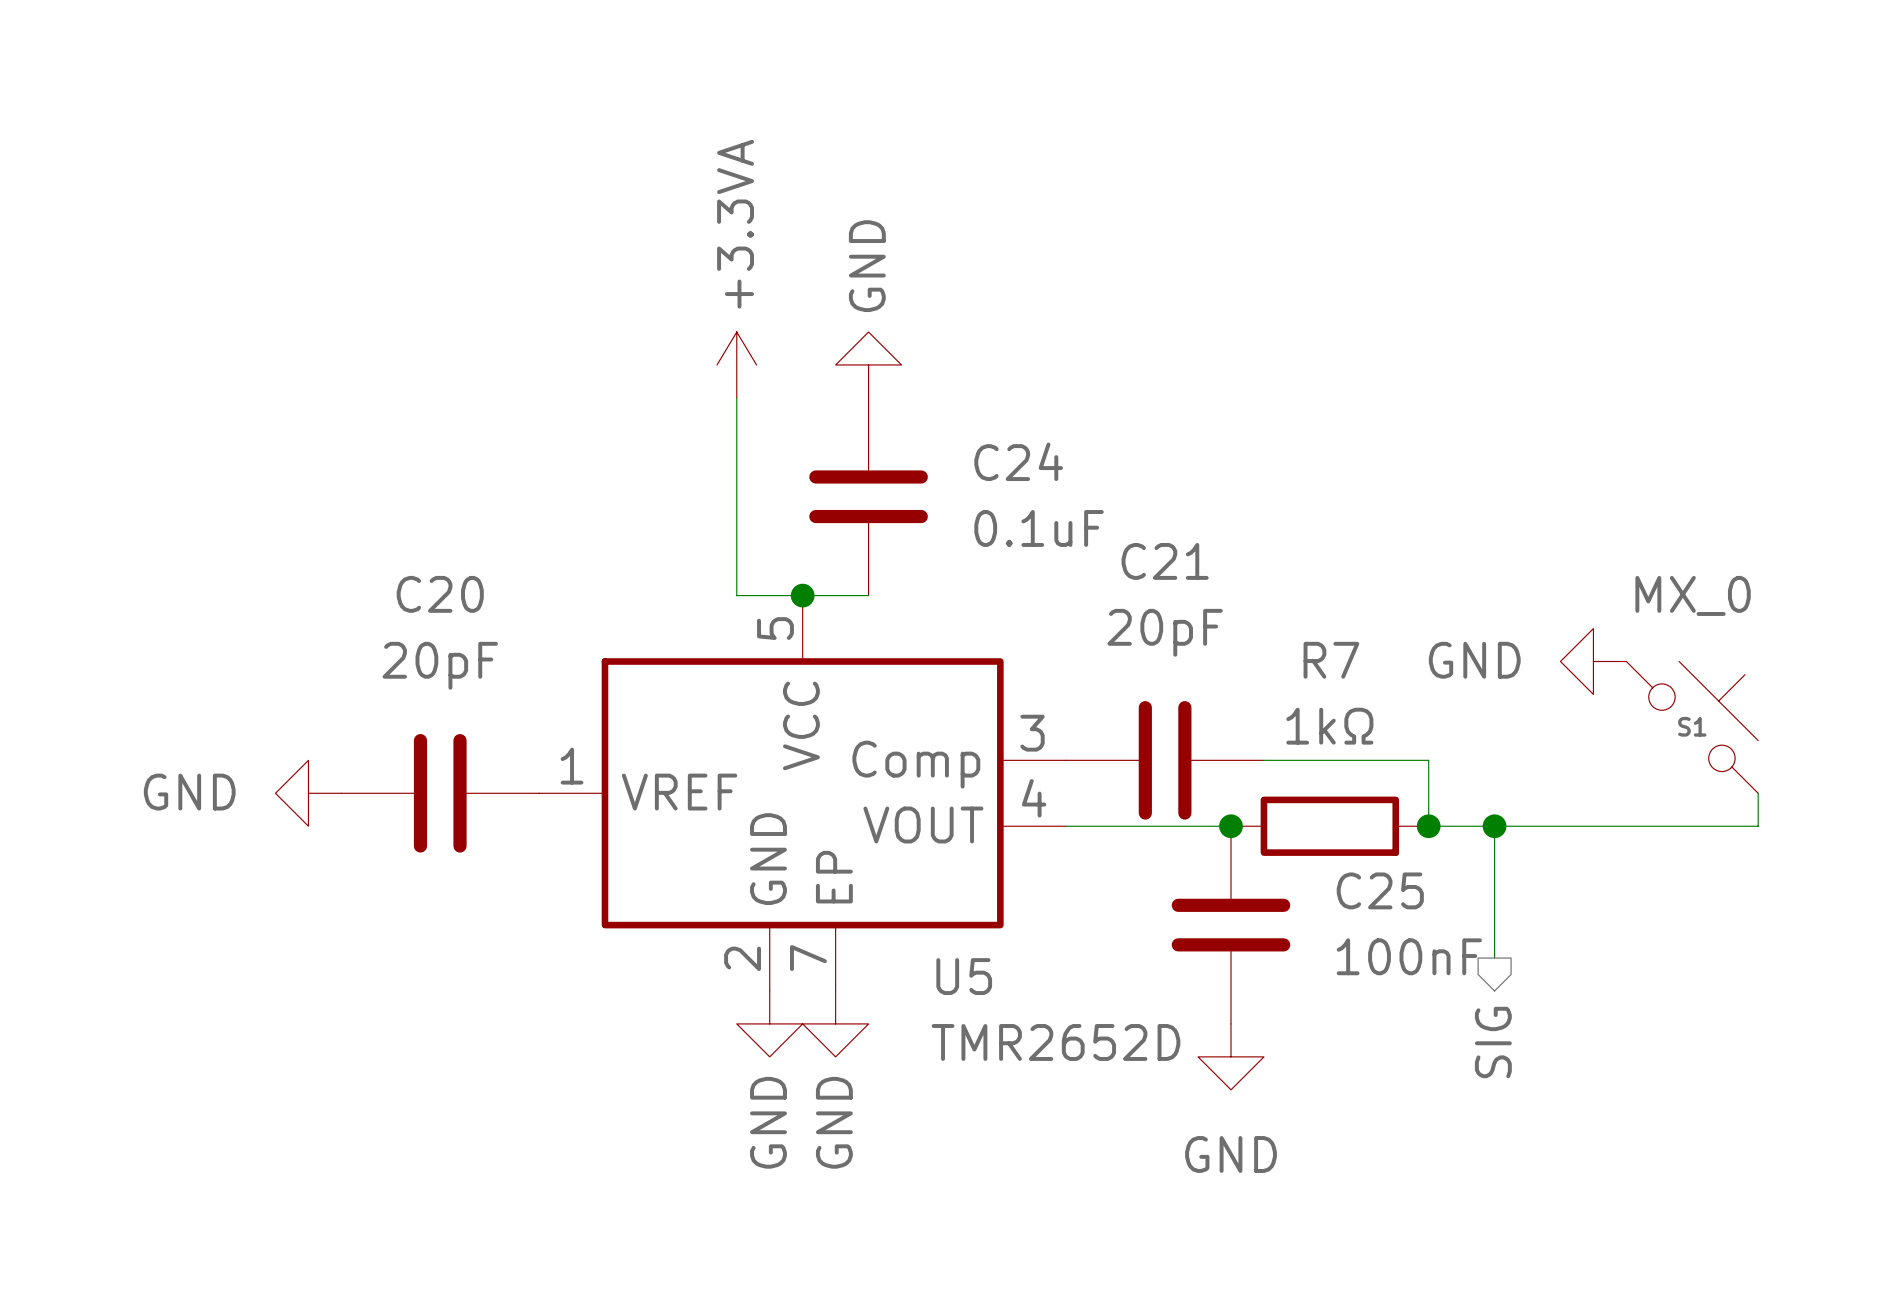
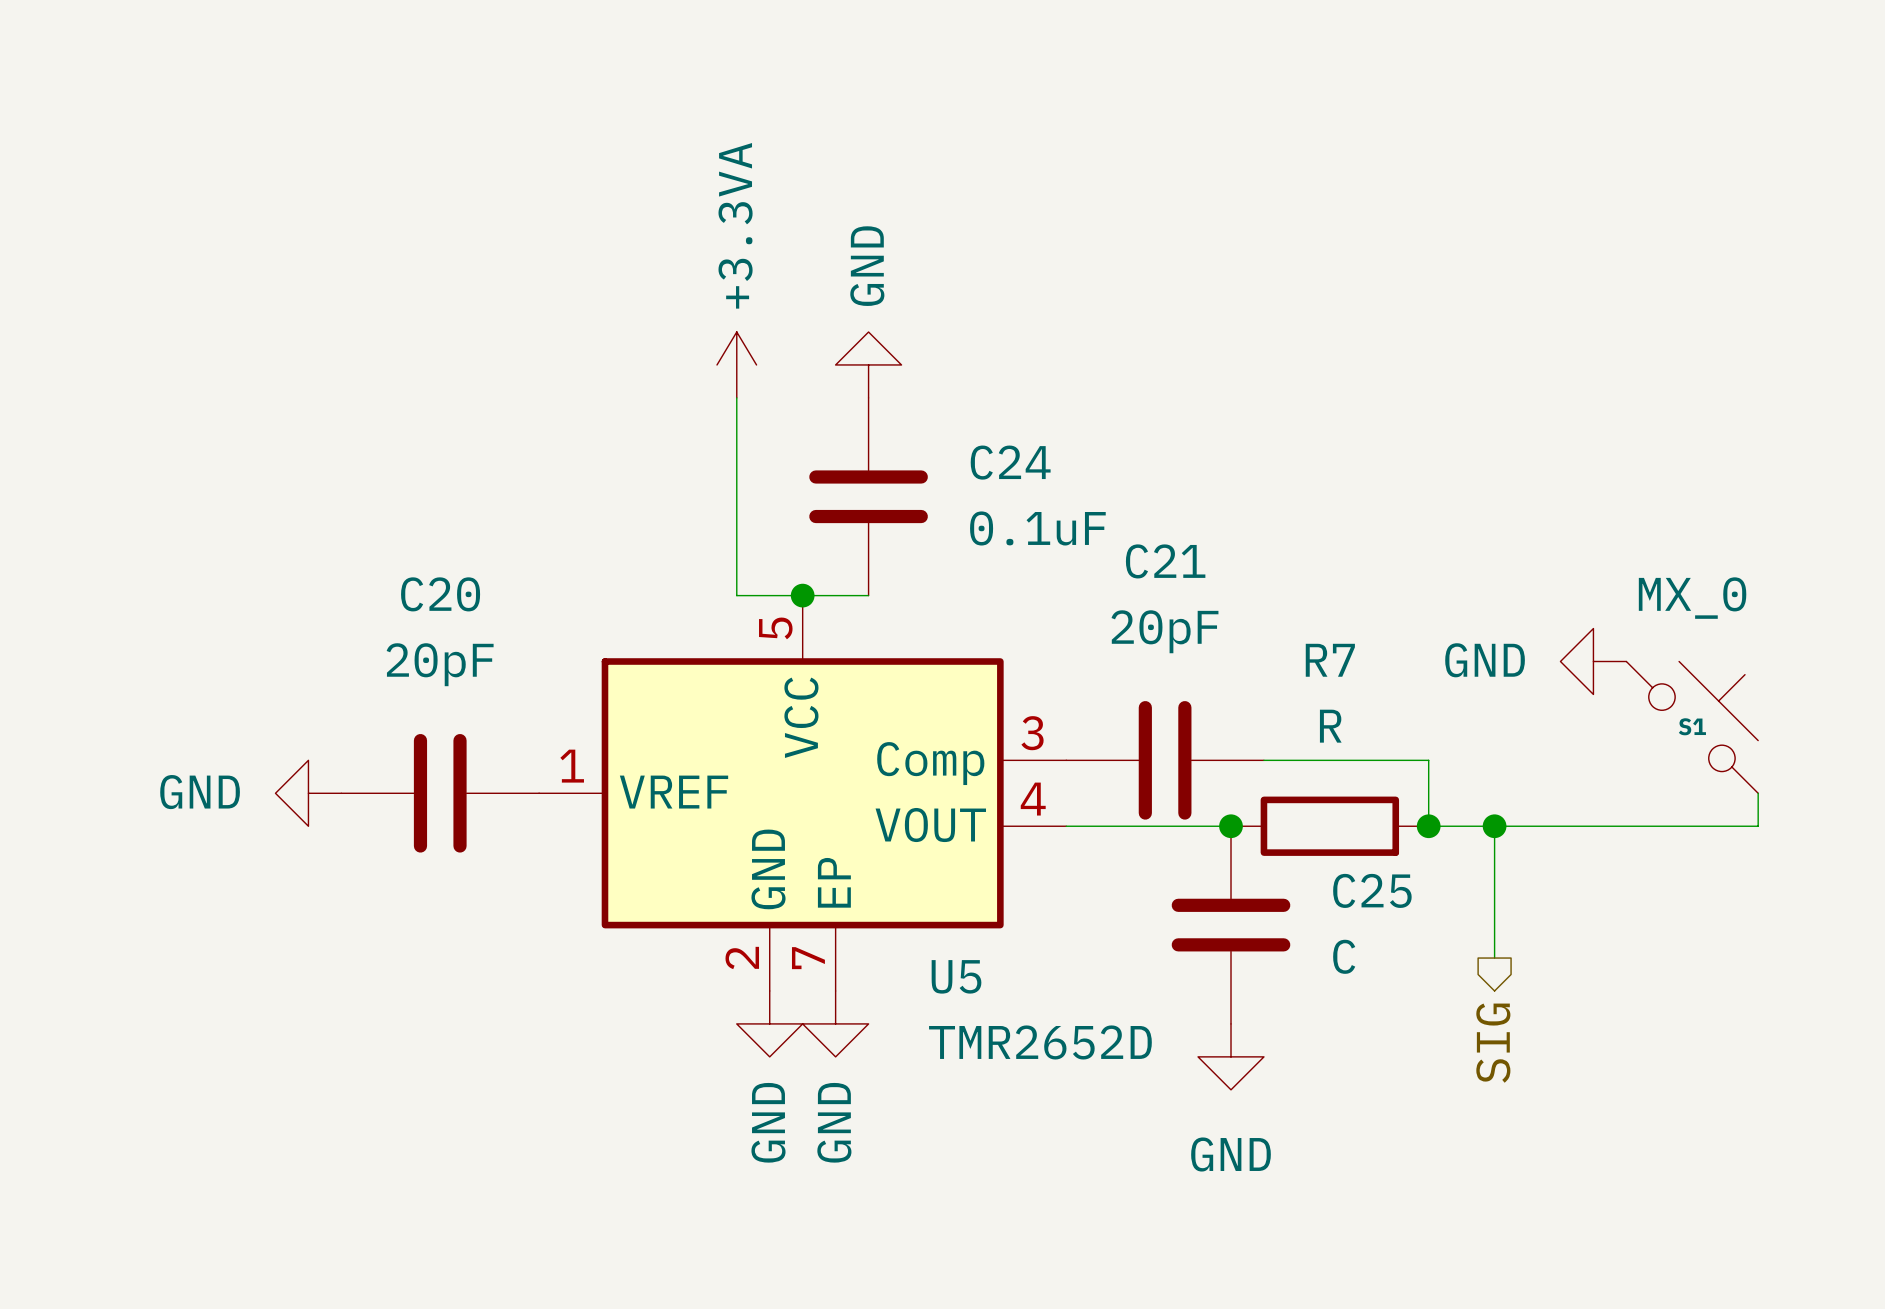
R7 value: 1kΩ (1329, 726) -> R (1330, 726)
C25 value: 100nF (1409, 956) -> C (1344, 956)

